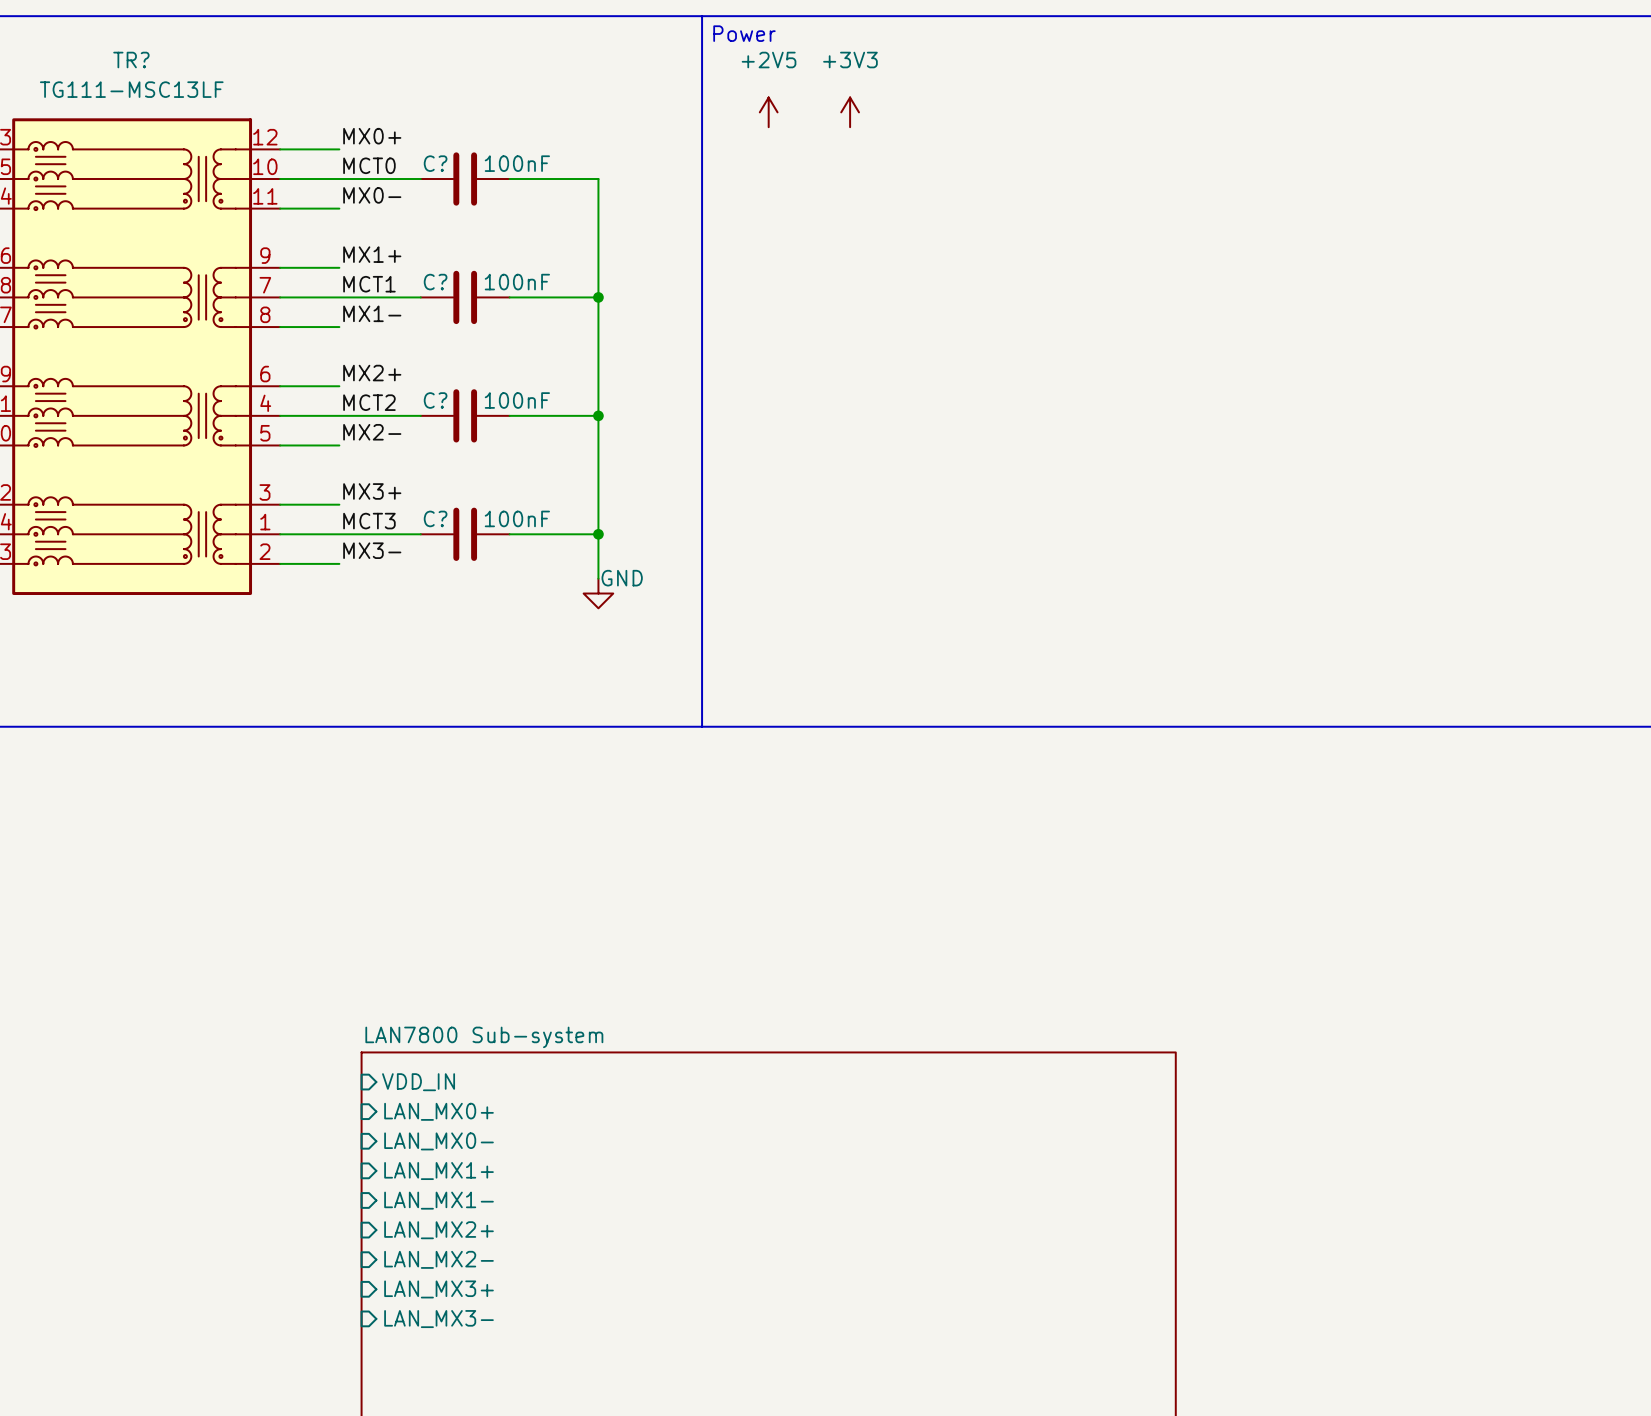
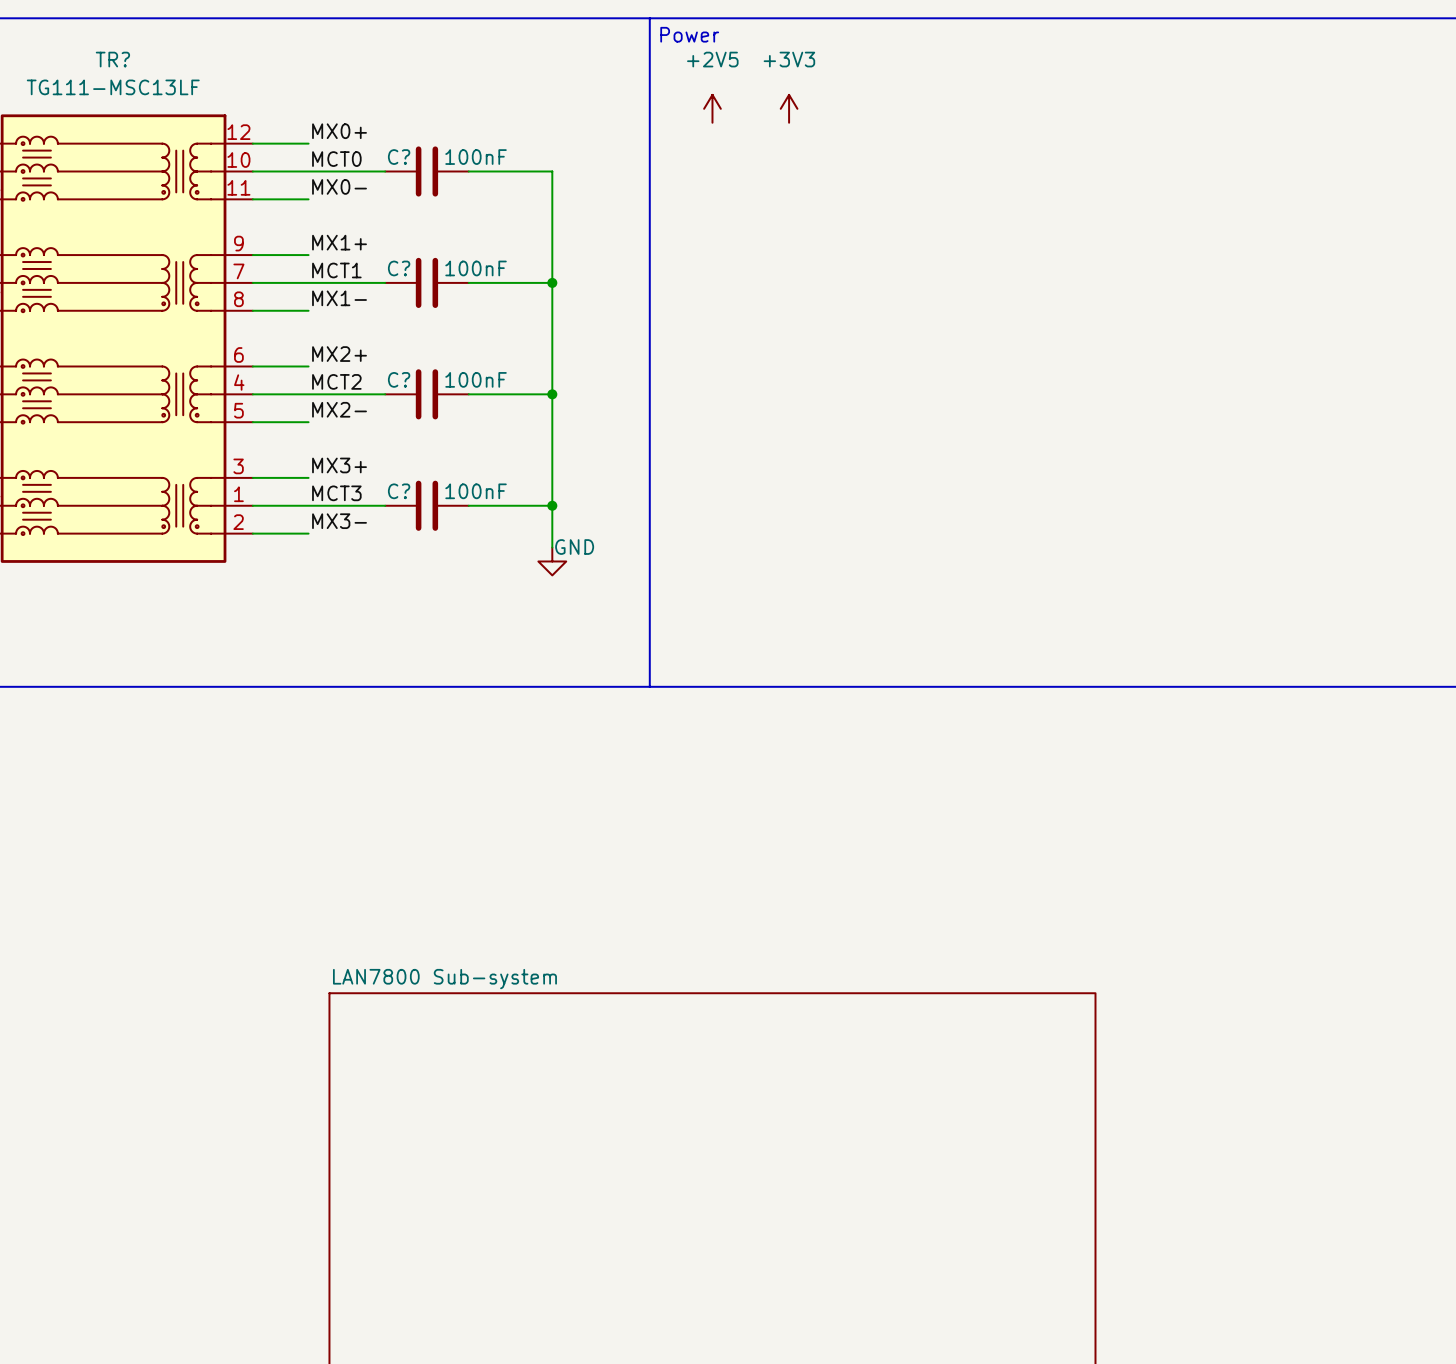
sheet pin: VDD_IN (418, 1082) -> none
sheet pin: LAN_MX0+ (439, 1111) -> none
sheet pin: LAN_MX0- (439, 1141) -> none
sheet pin: LAN_MX1+ (439, 1171) -> none
sheet pin: LAN_MX1- (439, 1200) -> none
sheet pin: LAN_MX2+ (439, 1230) -> none
sheet pin: LAN_MX2- (439, 1259) -> none
sheet pin: LAN_MX3+ (439, 1289) -> none
sheet pin: LAN_MX3- (439, 1319) -> none

